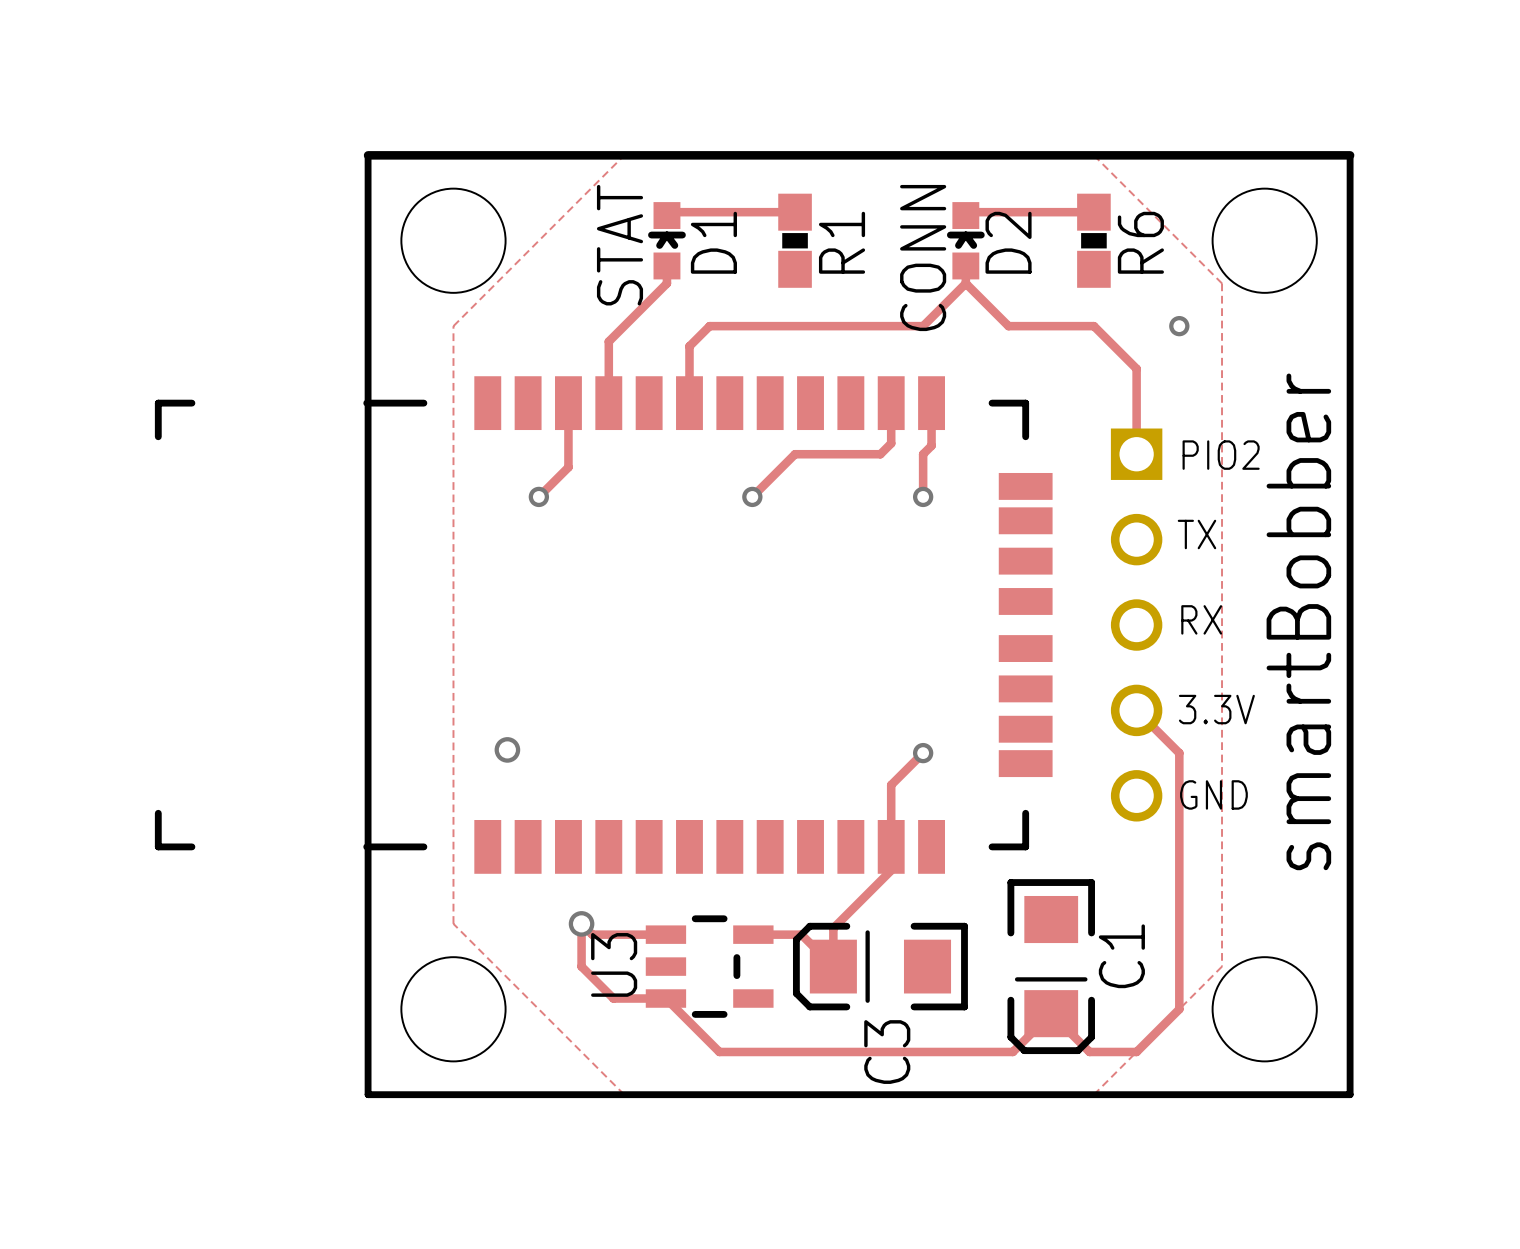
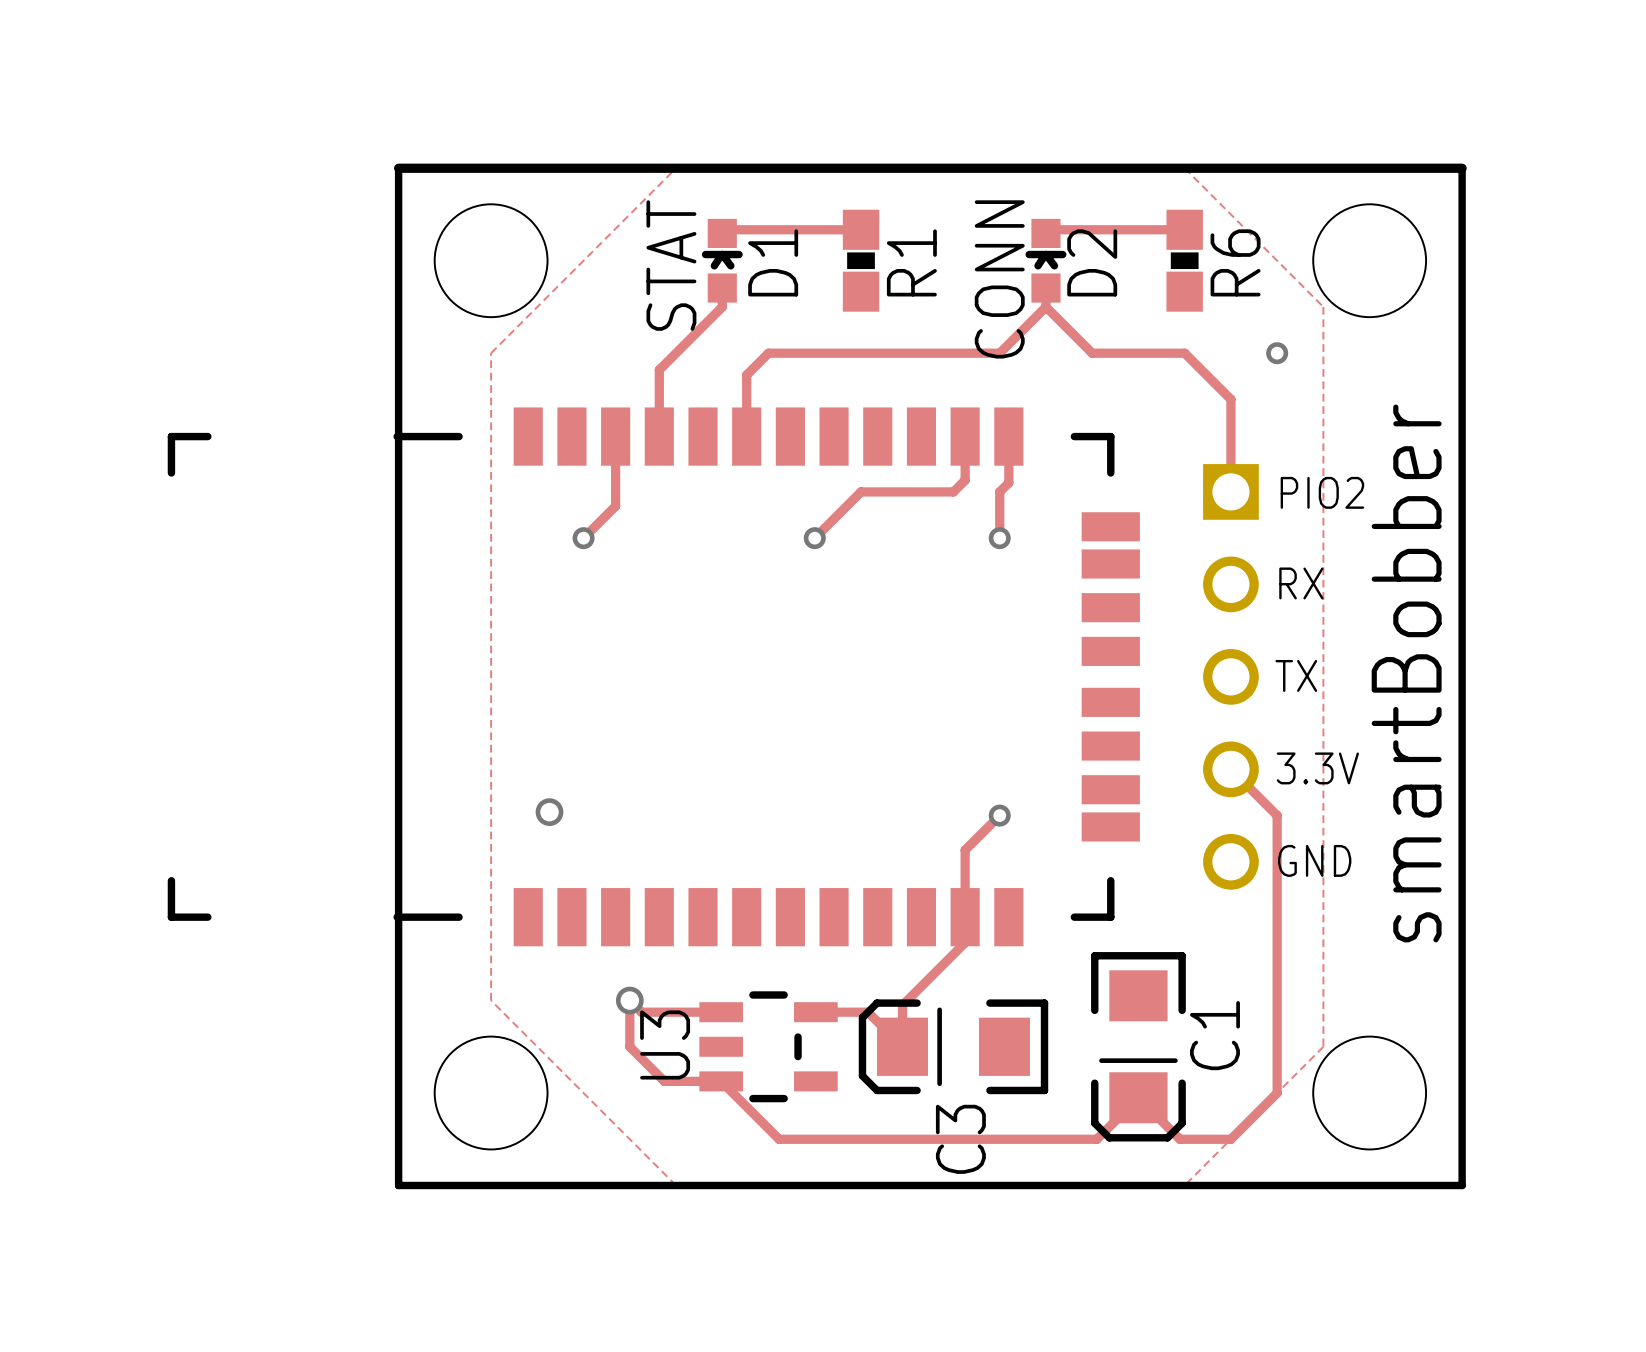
text position: TX (1196, 534) -> TX (1296, 675)
text position: RX (1201, 619) -> RX (1301, 583)

